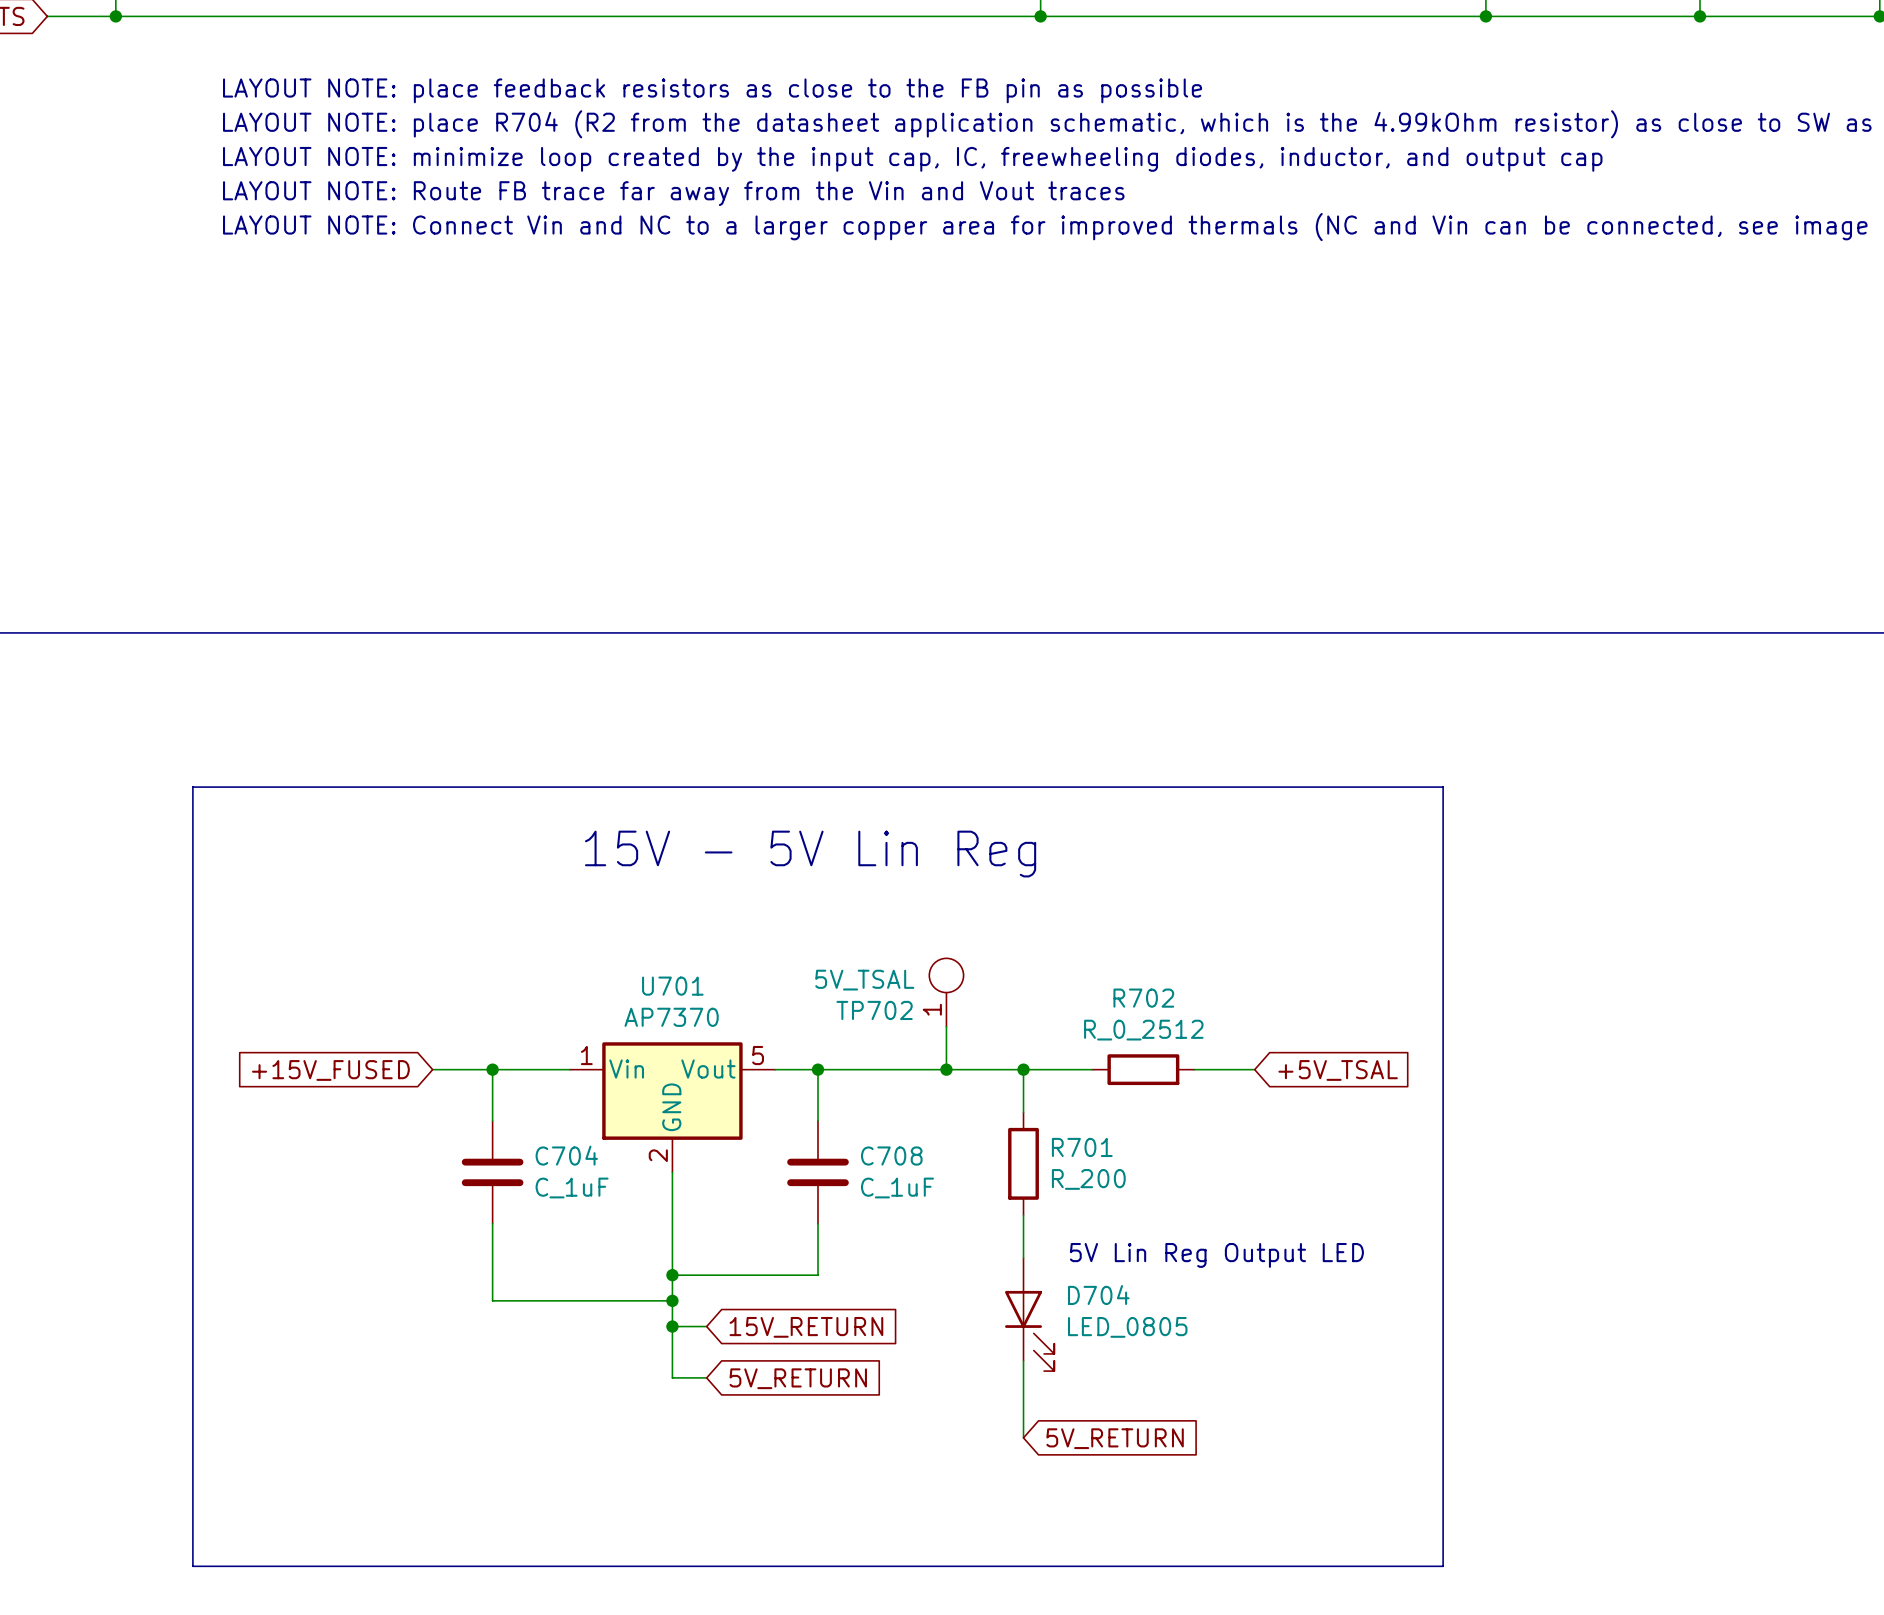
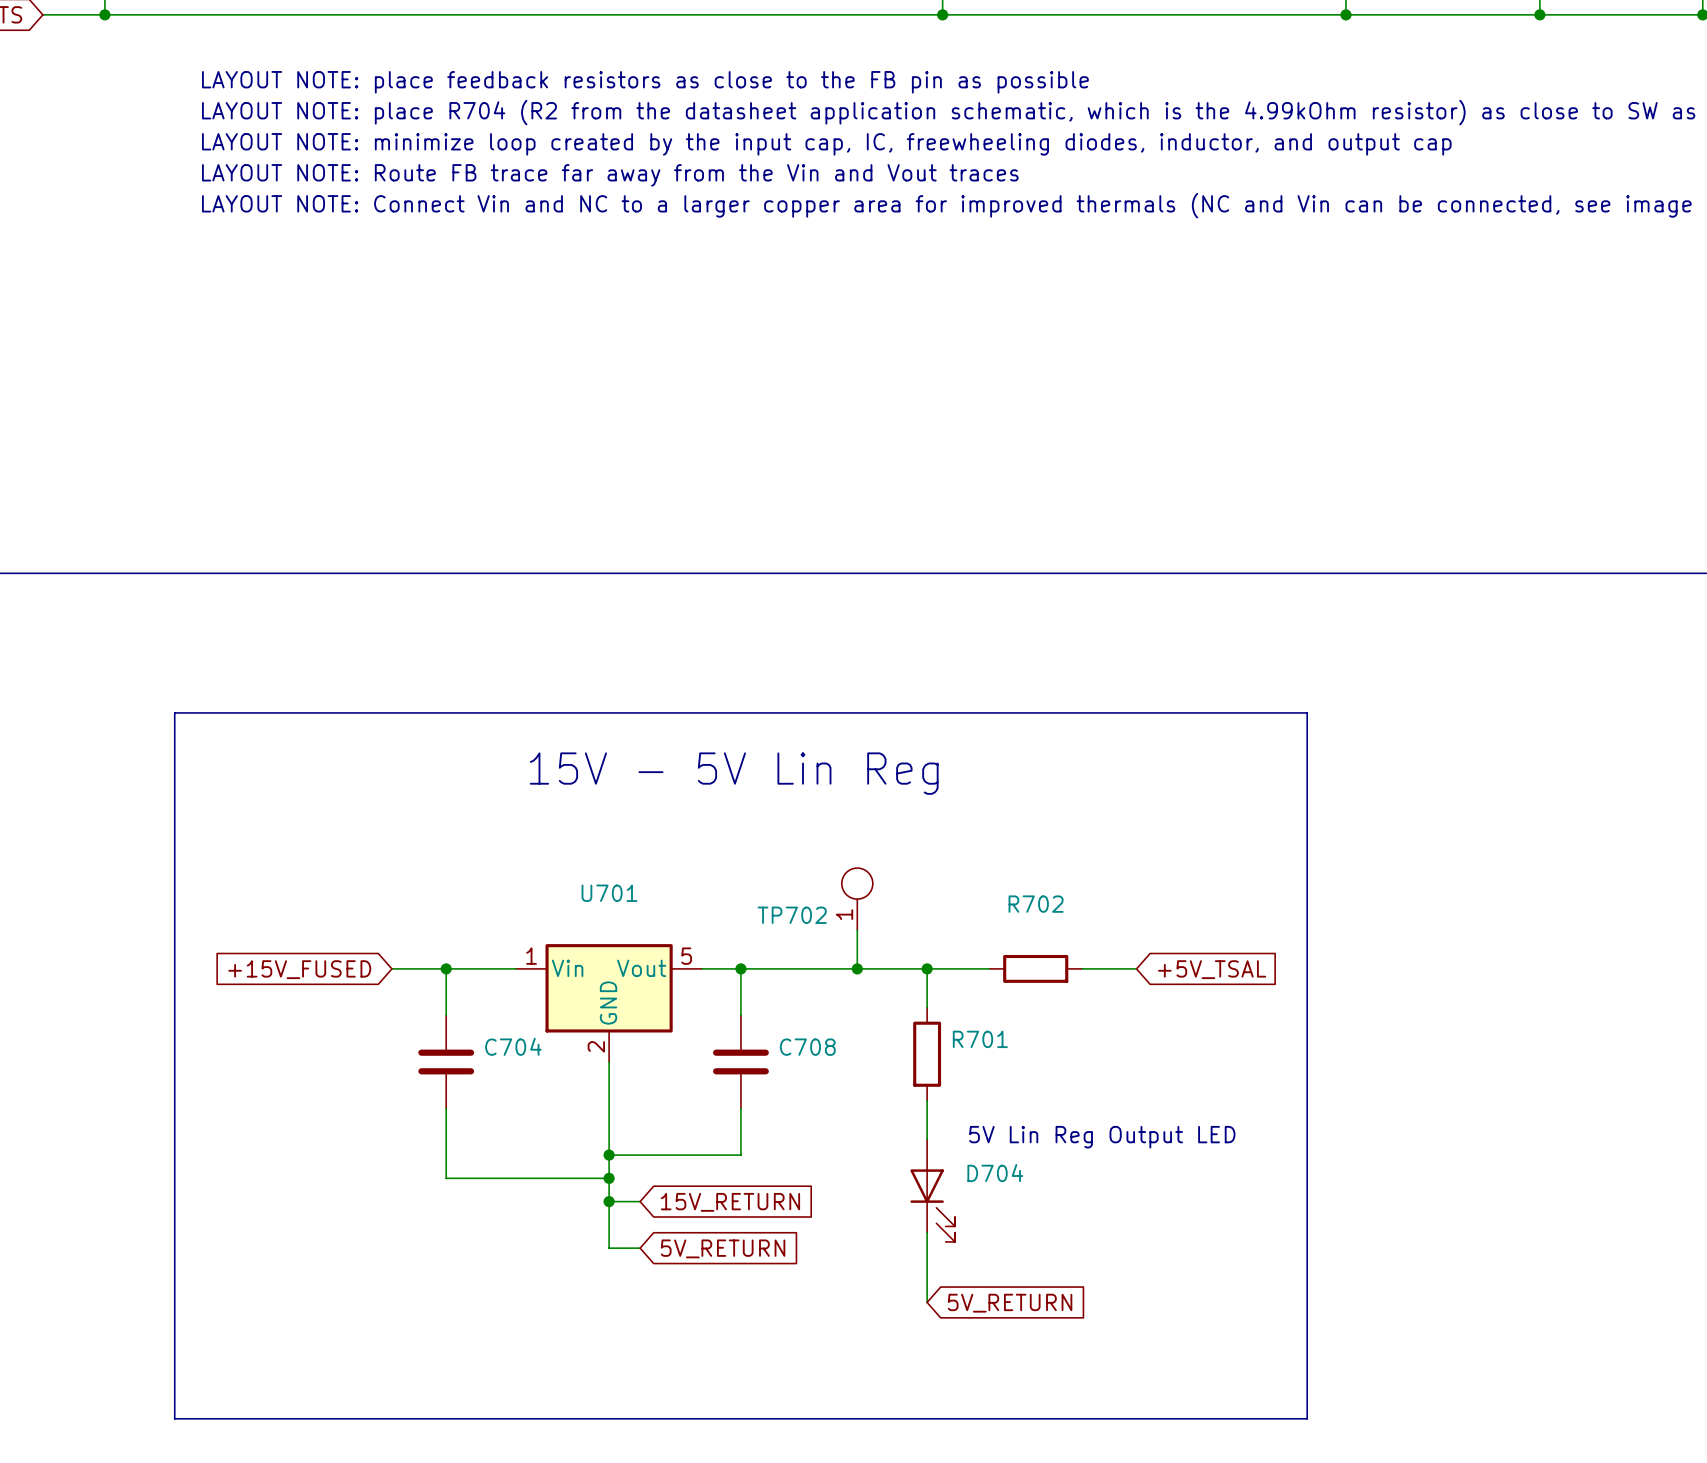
TP702 value: 5V_TSAL (864, 980) -> none
U701 value: AP7370 (671, 1017) -> none
R702 value: R_0_2512 (1143, 1030) -> none
R701 value: R_200 (1088, 1179) -> none
C704 value: C_1uF (572, 1188) -> none
C708 value: C_1uF (897, 1188) -> none
D704 value: LED_0805 (1127, 1327) -> none

